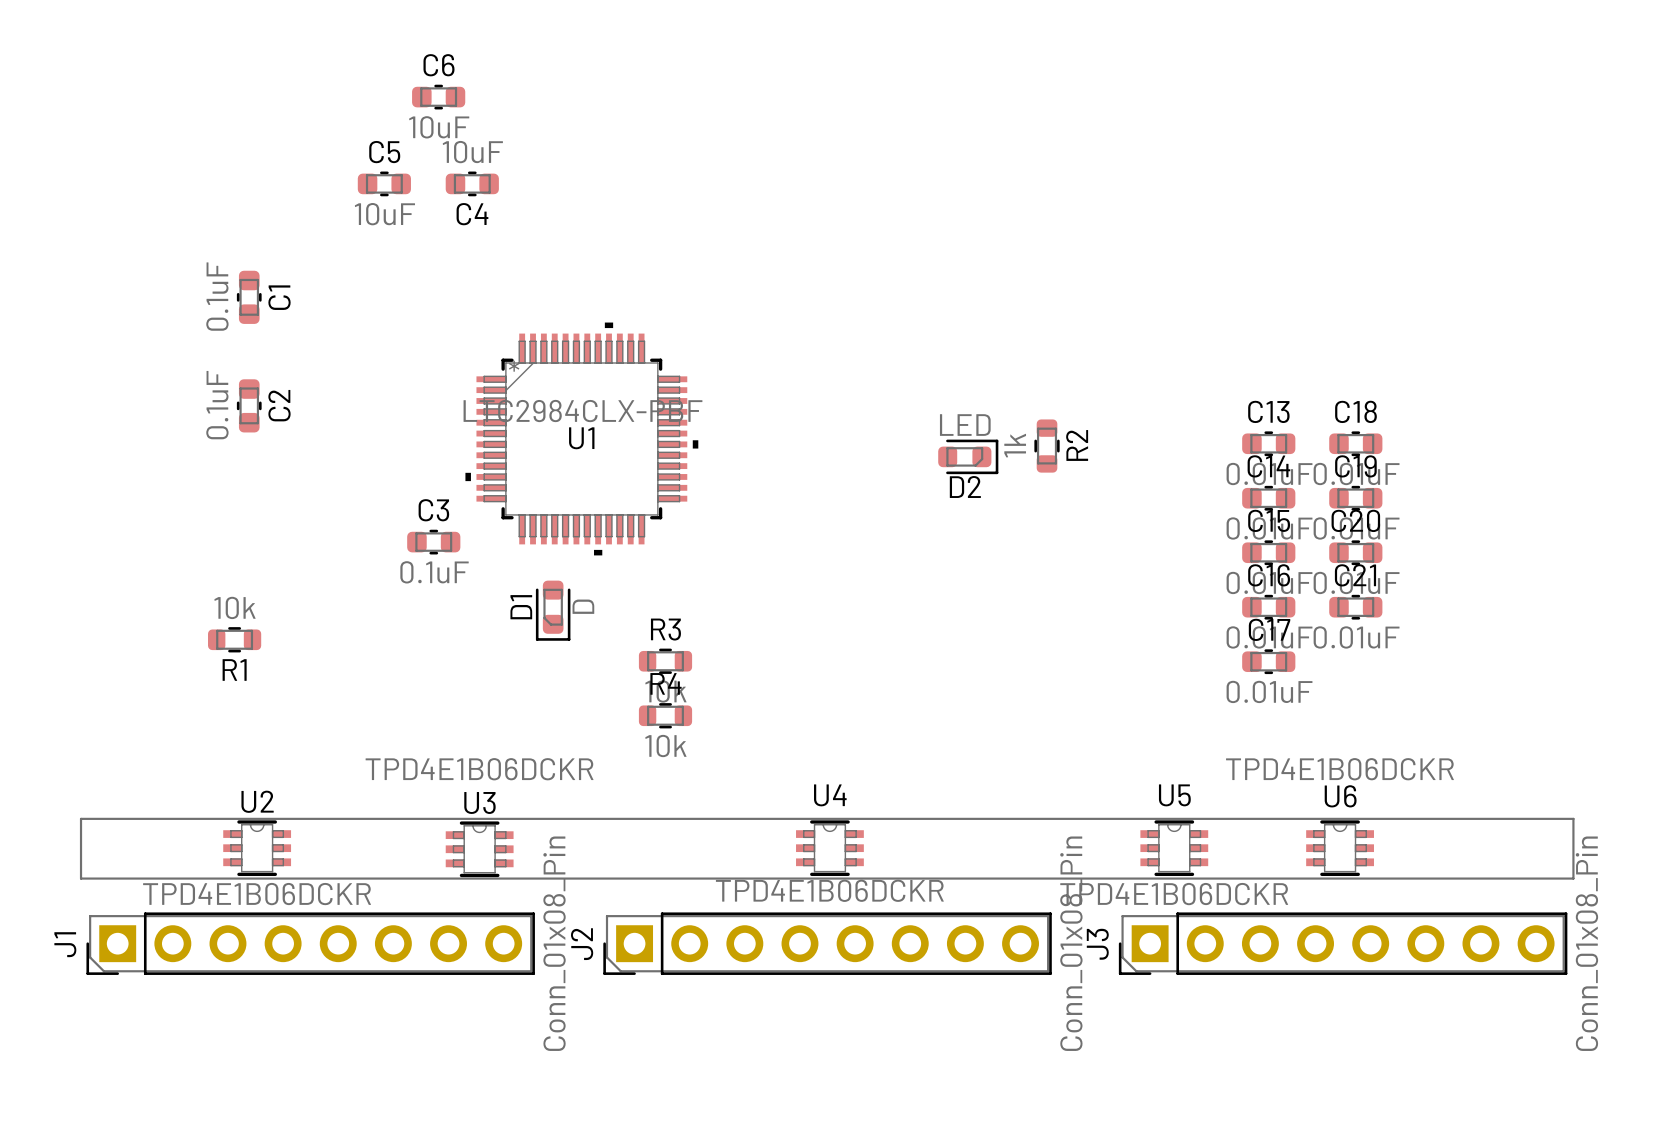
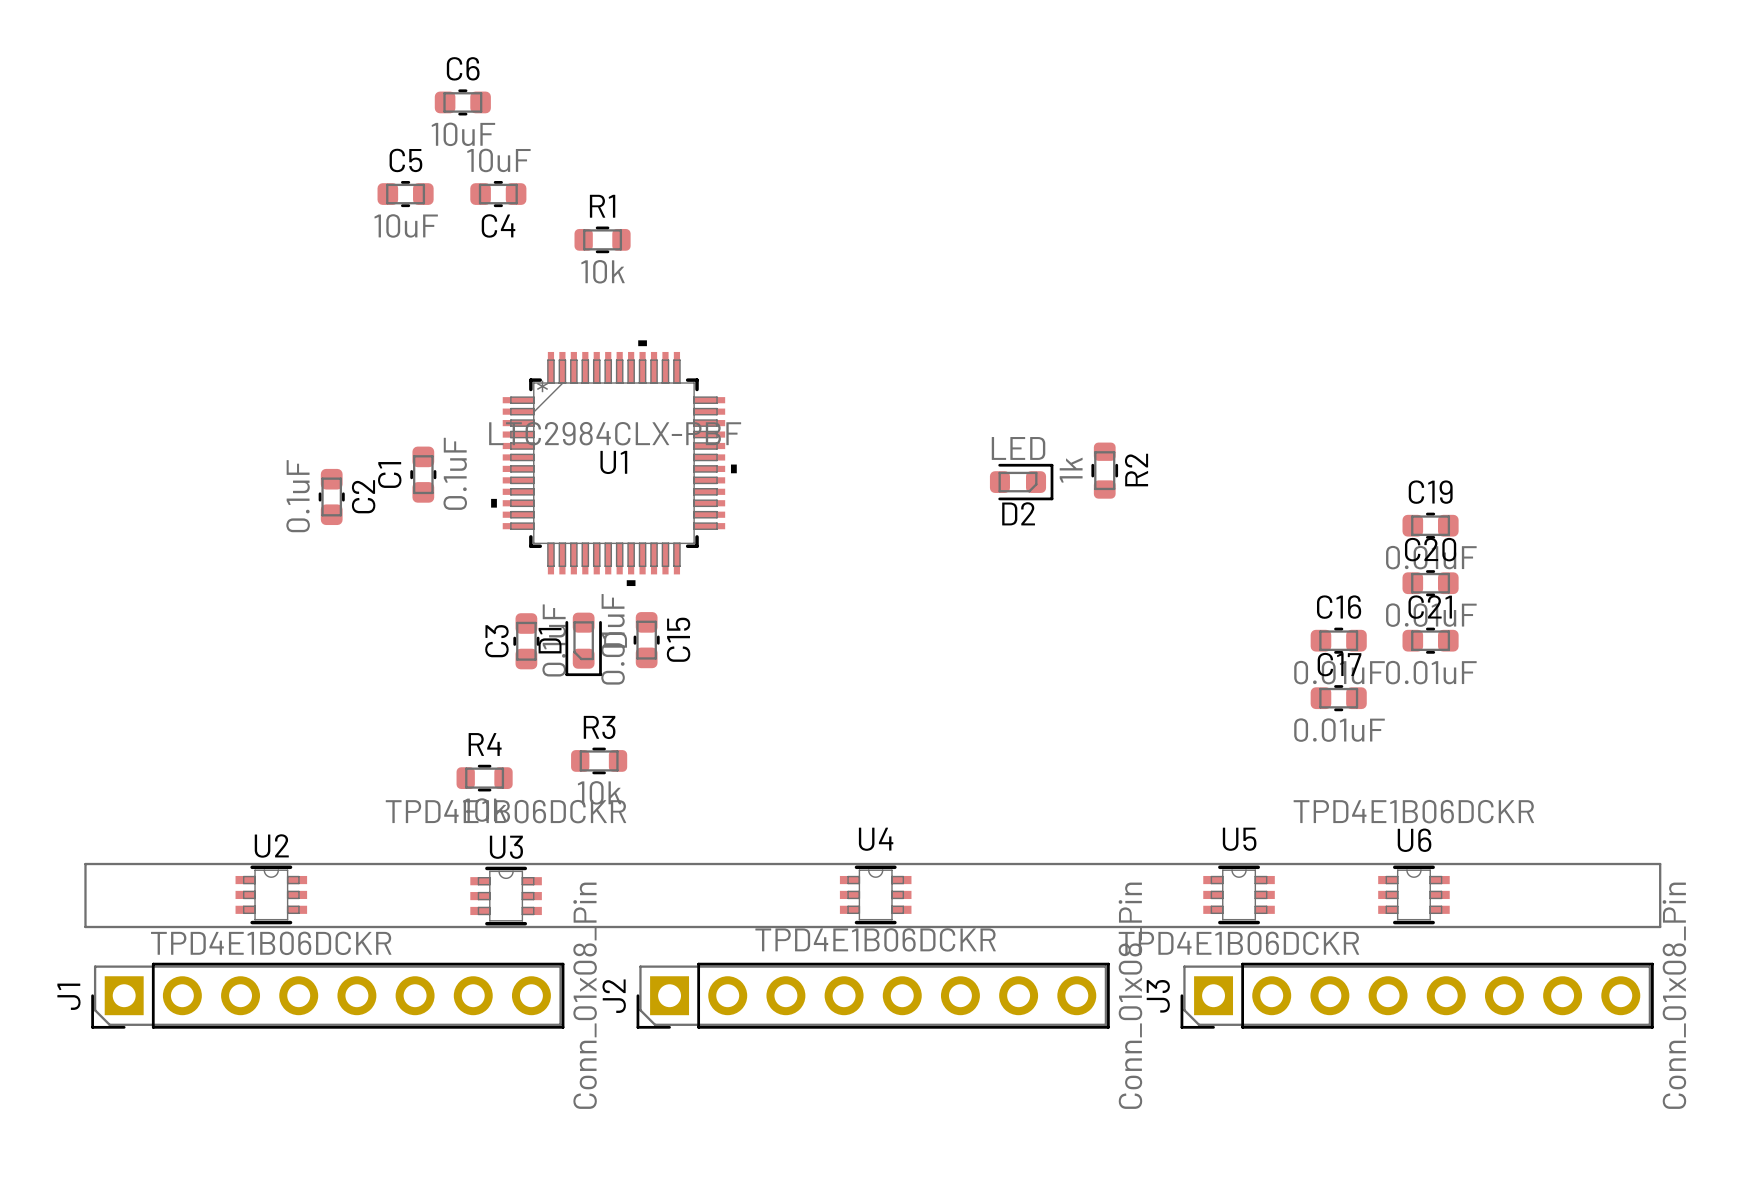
C1 value position: 0.1uF (217, 296) -> 0.1uF (455, 473)
C1 position: (249, 297) -> (423, 474)
C1 name position: C1 (279, 297) -> C1 (389, 474)
C2 position: (249, 405) -> (331, 496)
C13: 0.01uF (1268, 443) -> none
C18: 0.01uF (1355, 443) -> none
C14: 0.01uF (1268, 498) -> none
C3 rotation: 0° (433, 542) -> 90° clockwise (526, 641)
C3 position: (433, 542) -> (526, 641)
C15 rotation: 0° (1268, 552) -> 90° clockwise (646, 640)
C15 position: (1268, 552) -> (646, 640)
R1 value position: 10k (235, 607) -> 10k (603, 271)
R1 position: (234, 639) -> (602, 239)
R3 position: (665, 661) -> (599, 760)
R1 name position: R1 (234, 670) -> R1 (602, 206)
R4 position: (665, 715) -> (484, 778)

